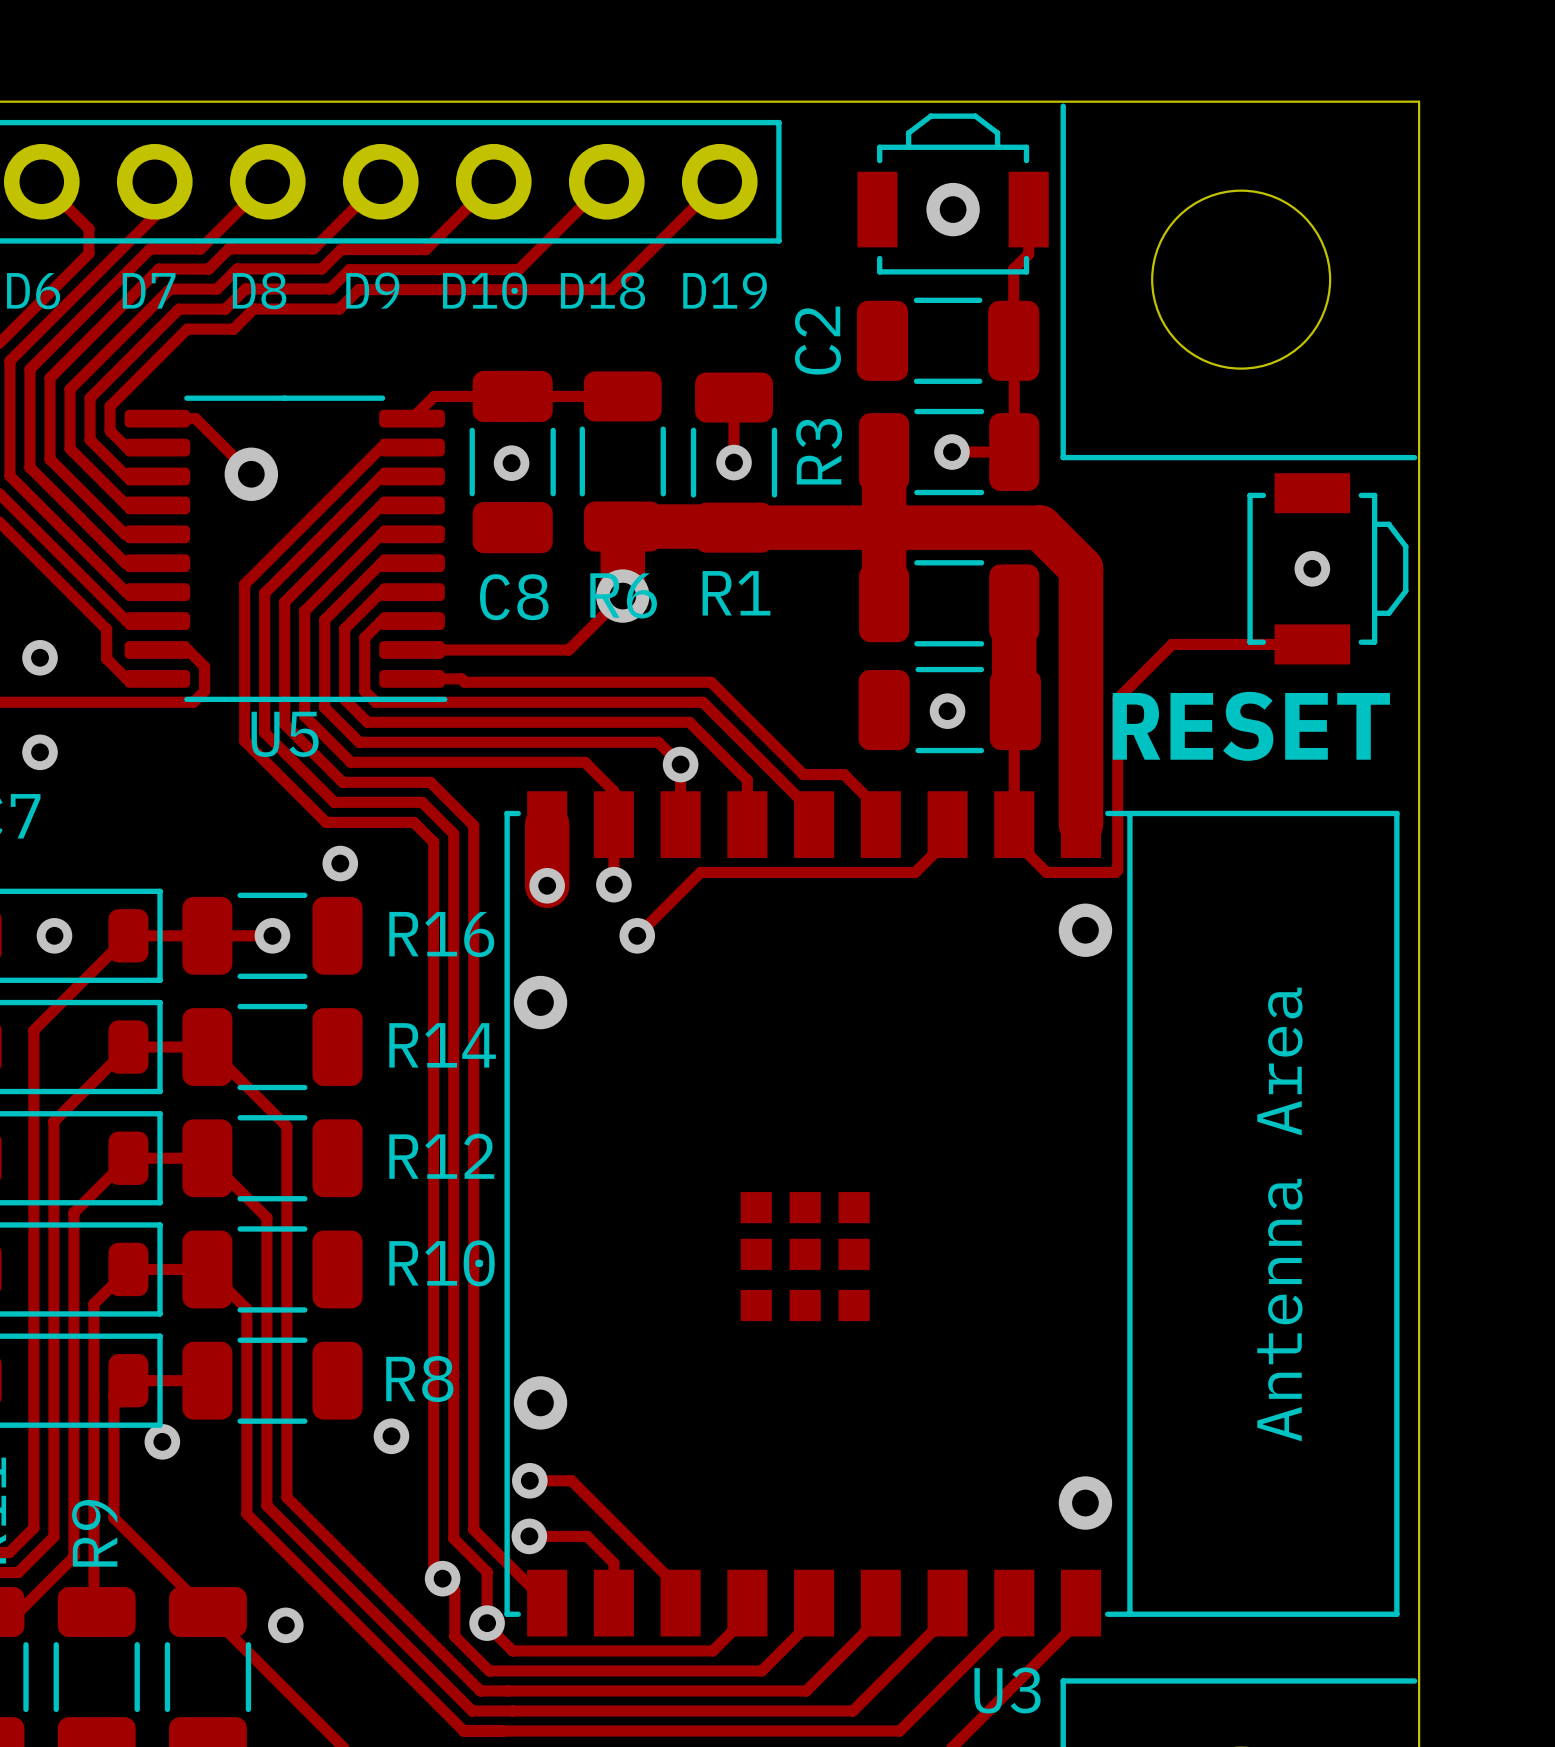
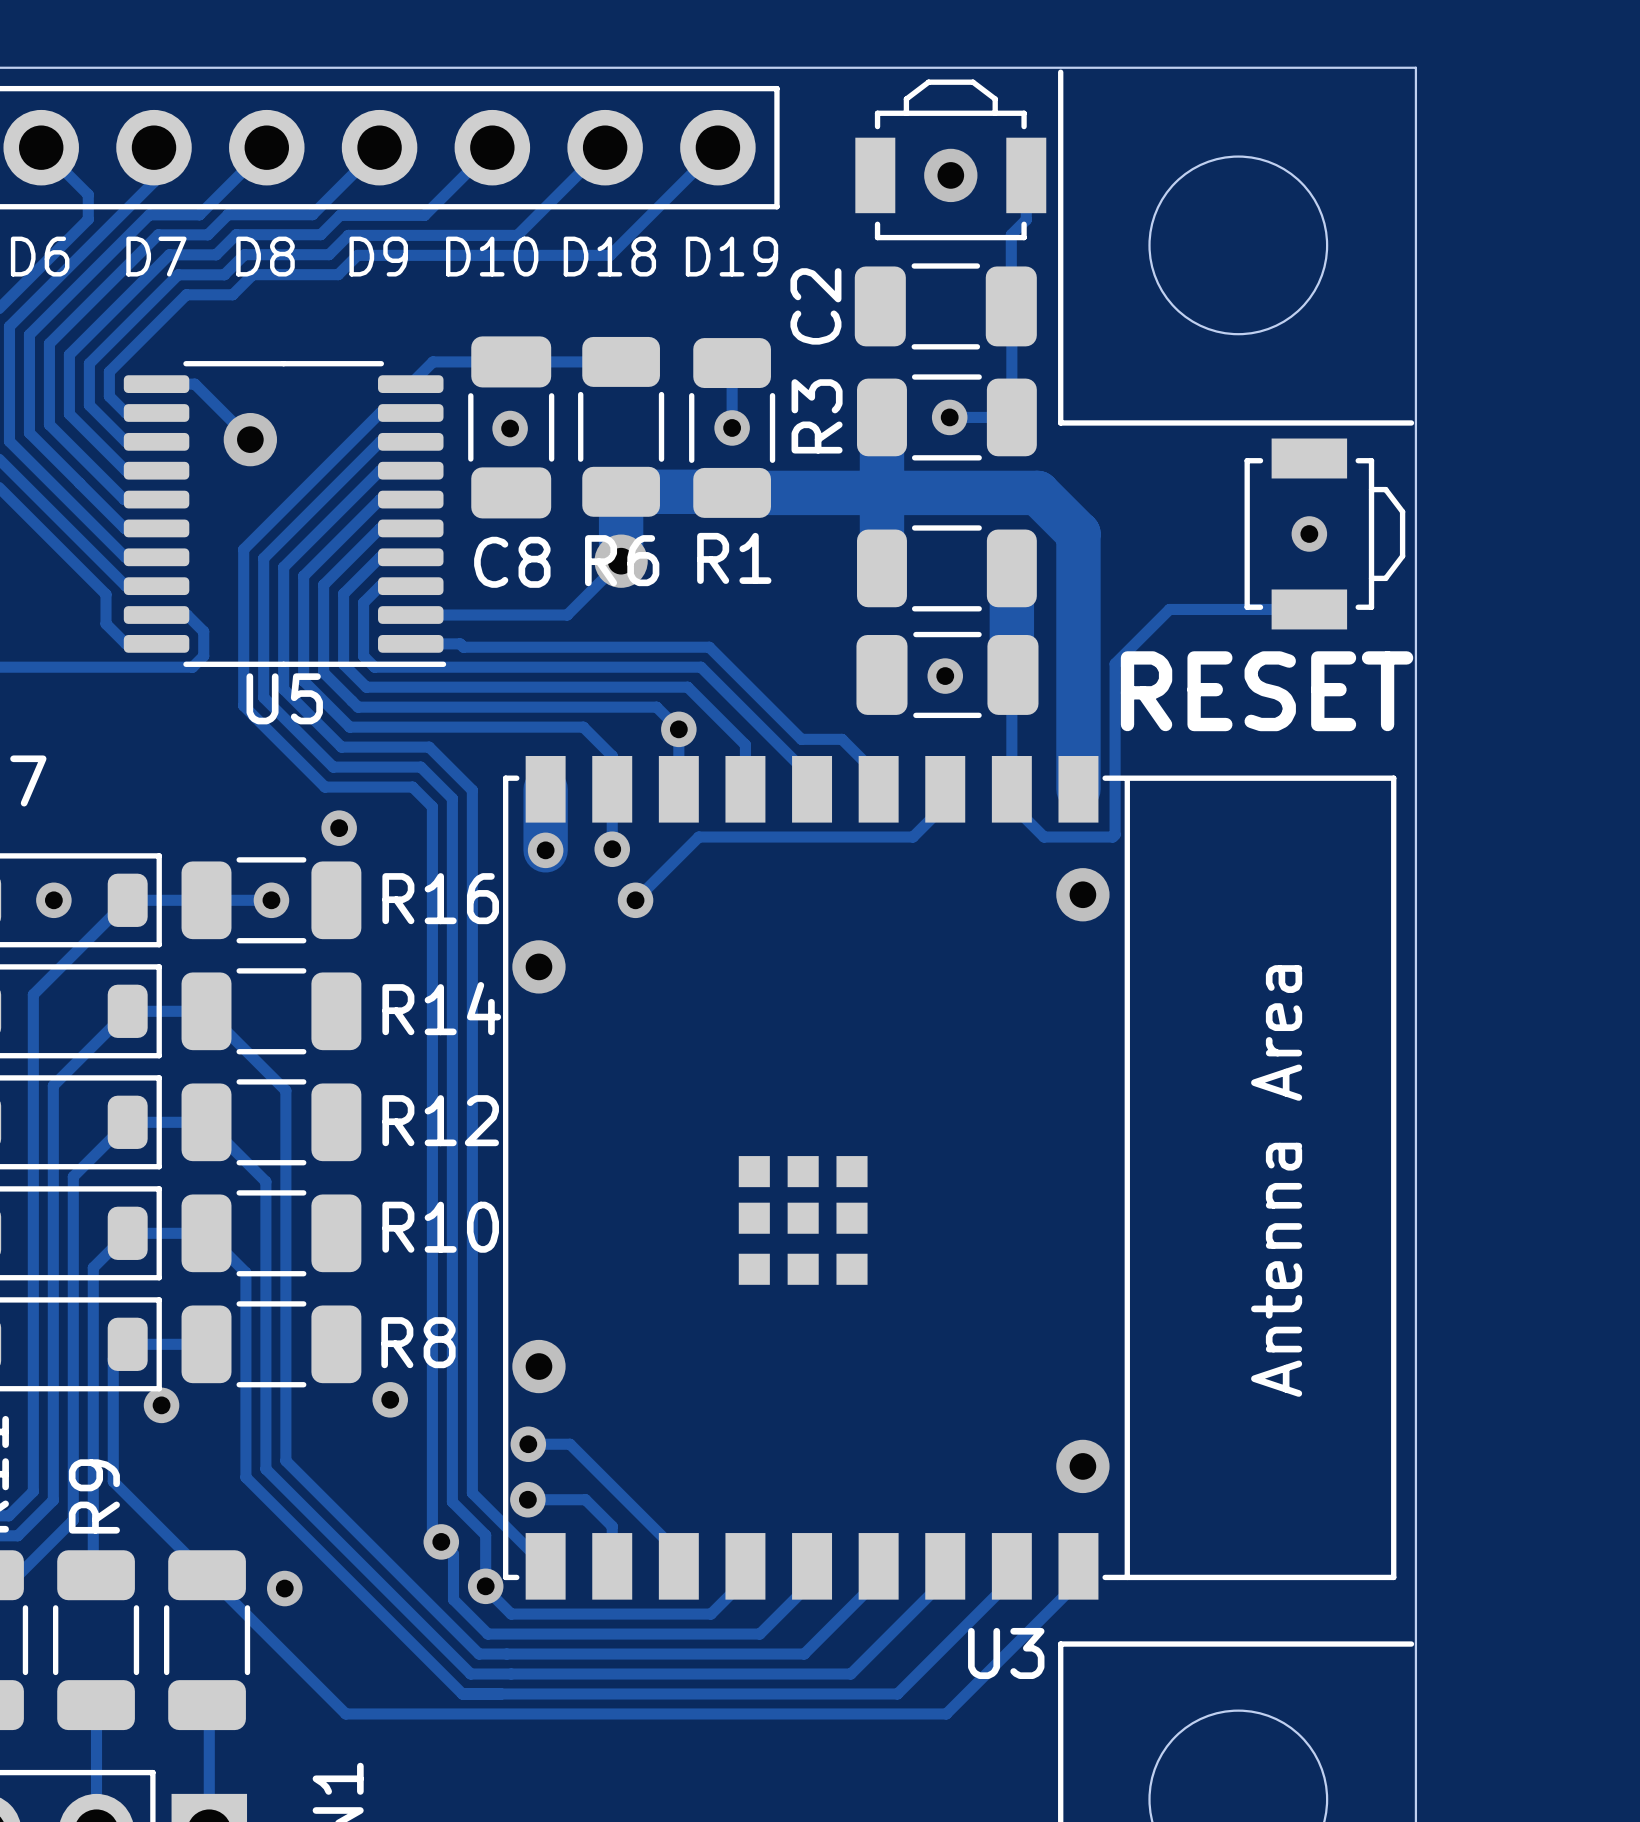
via: (40, 657) -> none
via: (40, 752) -> none

